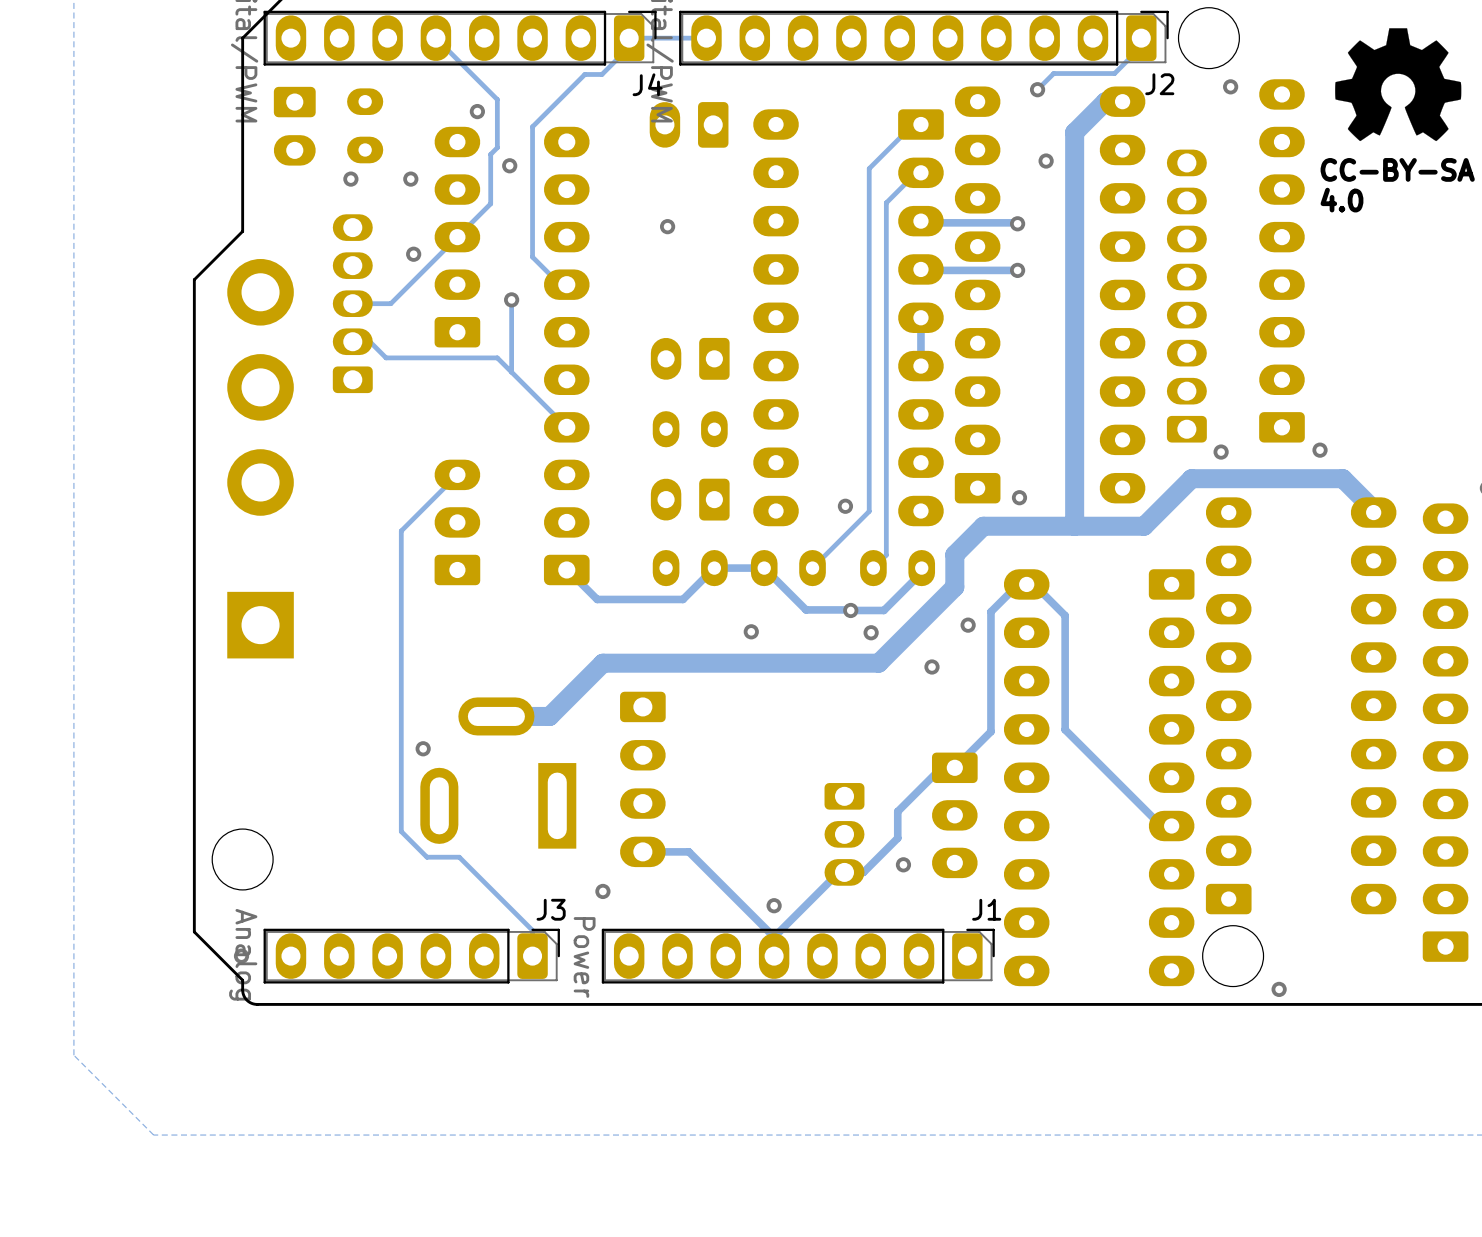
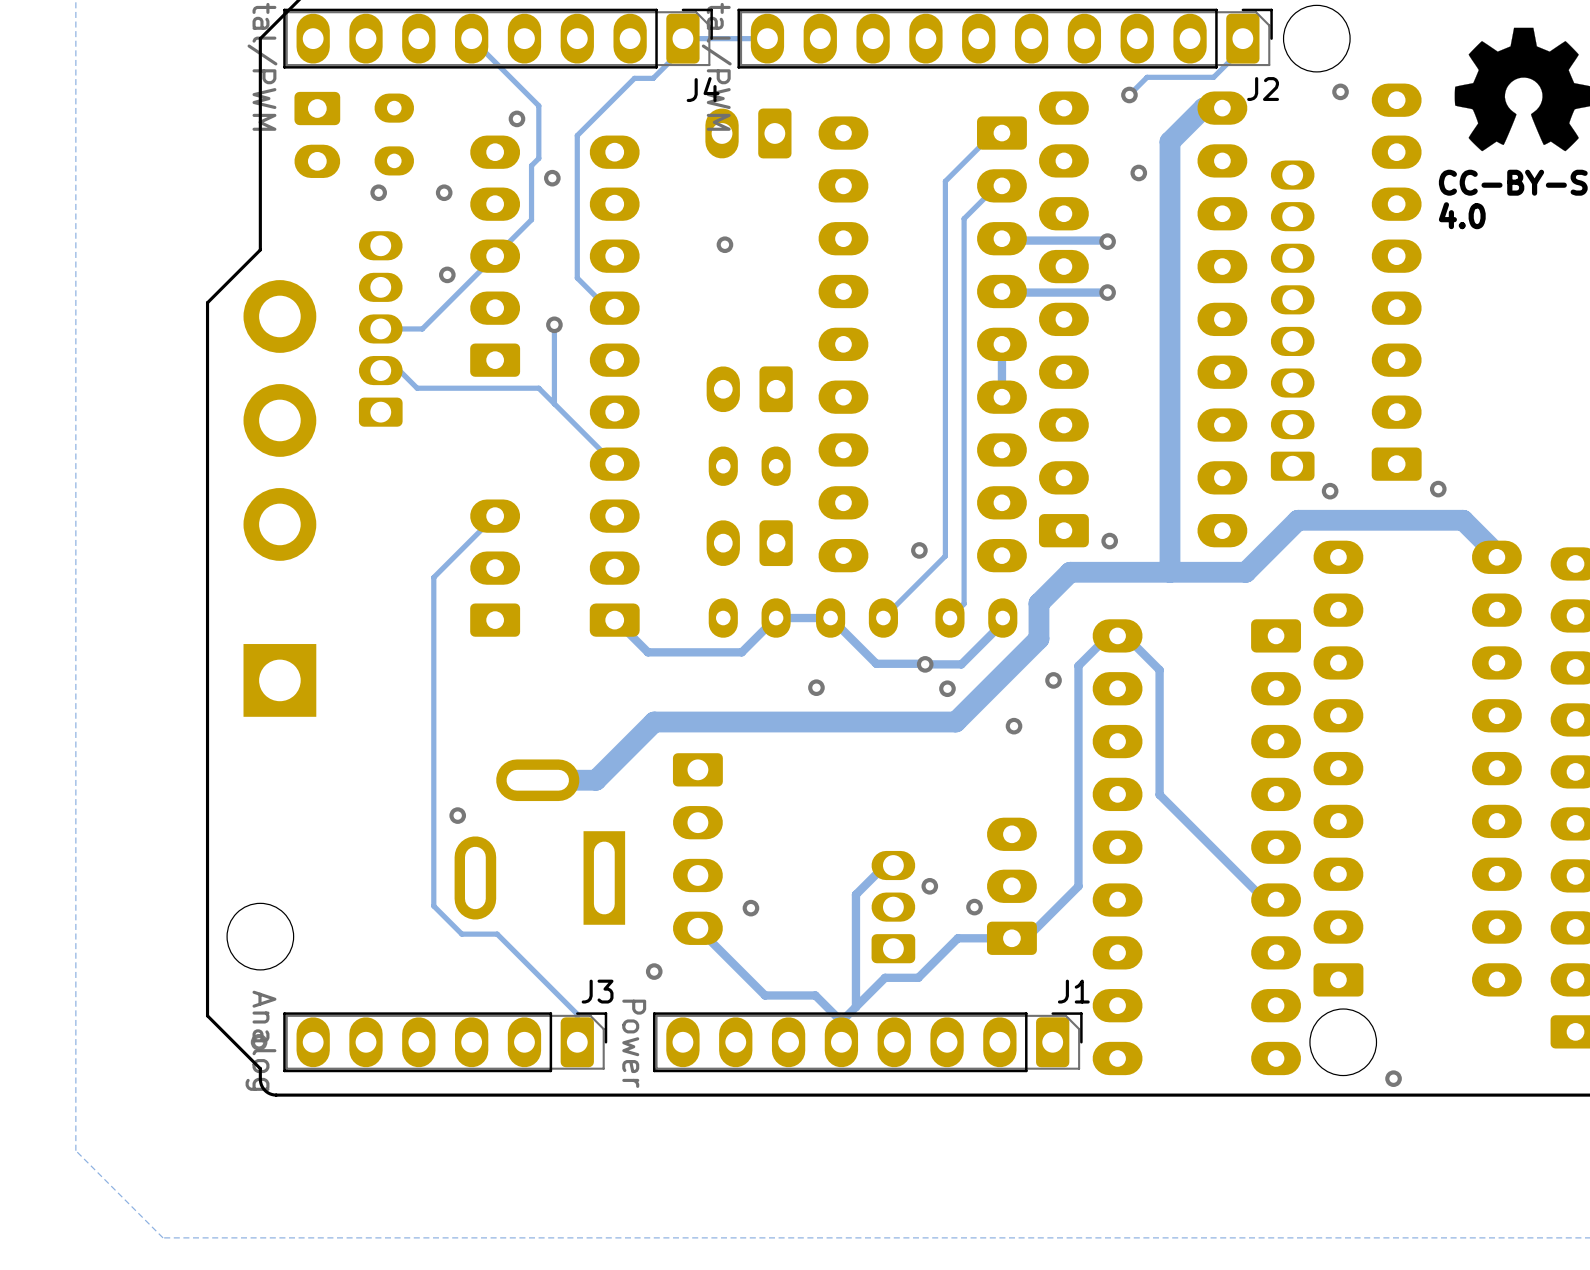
track: (990, 731) (954, 767) -> (1078, 796) (1078, 886) (1026, 938) (957, 938) (918, 977) (885, 977)
track: (954, 767) (941, 767) (897, 811) (897, 838) (863, 872) (844, 872) -> none
track: none -> (893, 865) (885, 865) (855, 894) (855, 1006)
via: none -> (929, 886)
part rotation: 0° (954, 815) -> 180° (1011, 886)
via: none -> (750, 908)
part rotation: 0° (844, 834) -> 180° (893, 907)
track: (642, 851) (688, 851) (750, 913) -> (697, 928) (765, 995) (815, 995)
via position: (903, 864) -> (974, 907)
track: (838, 872) (814, 897) -> none
via: (774, 905) -> none

